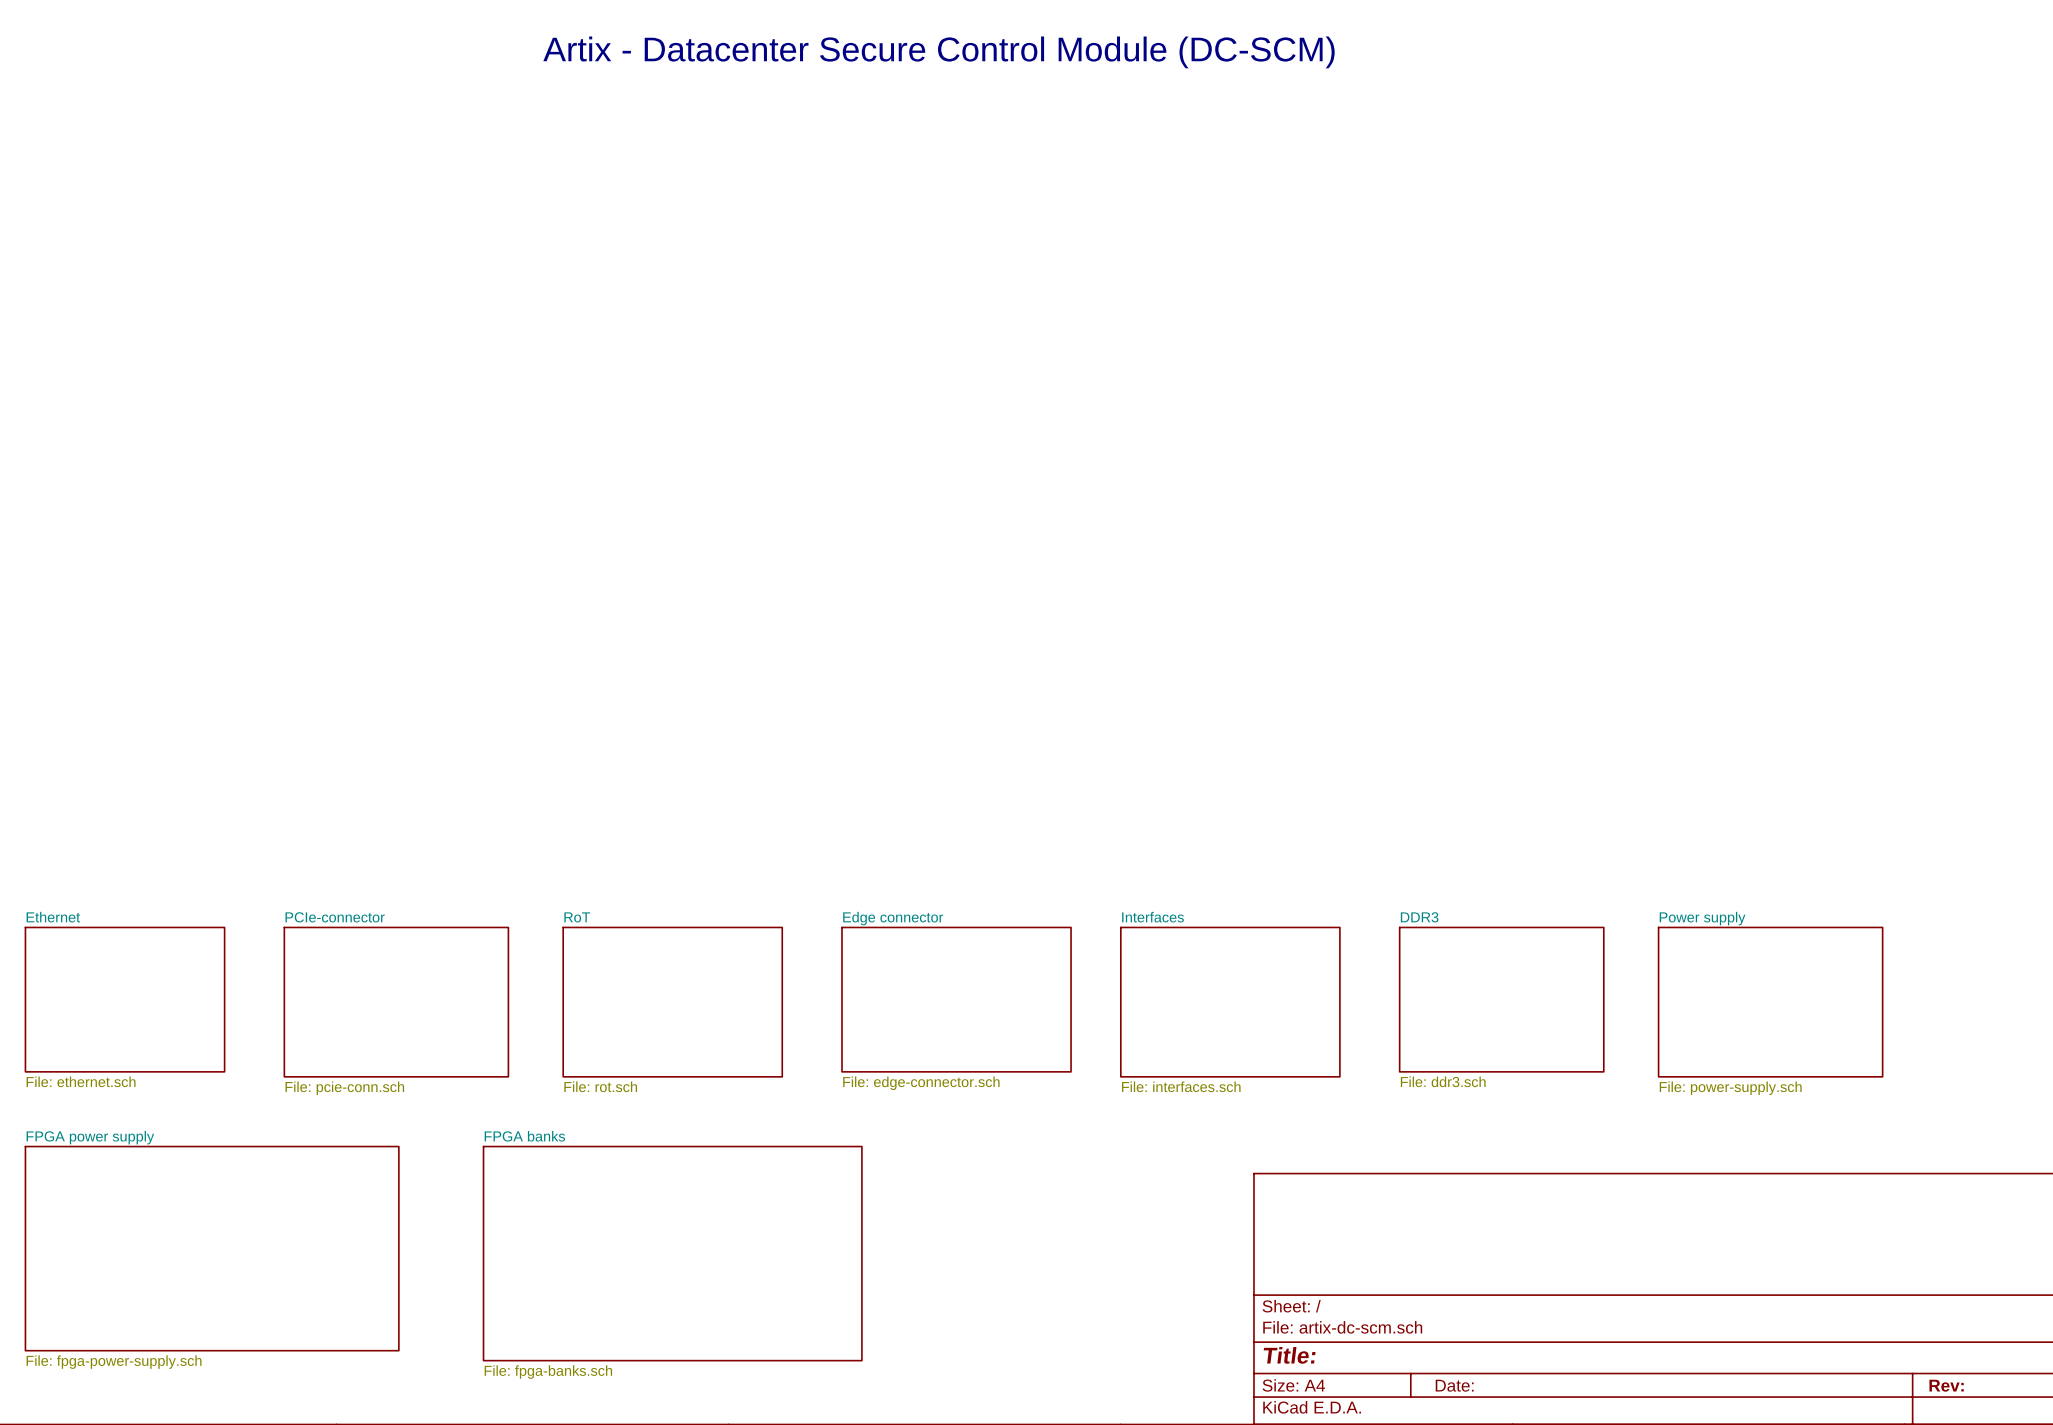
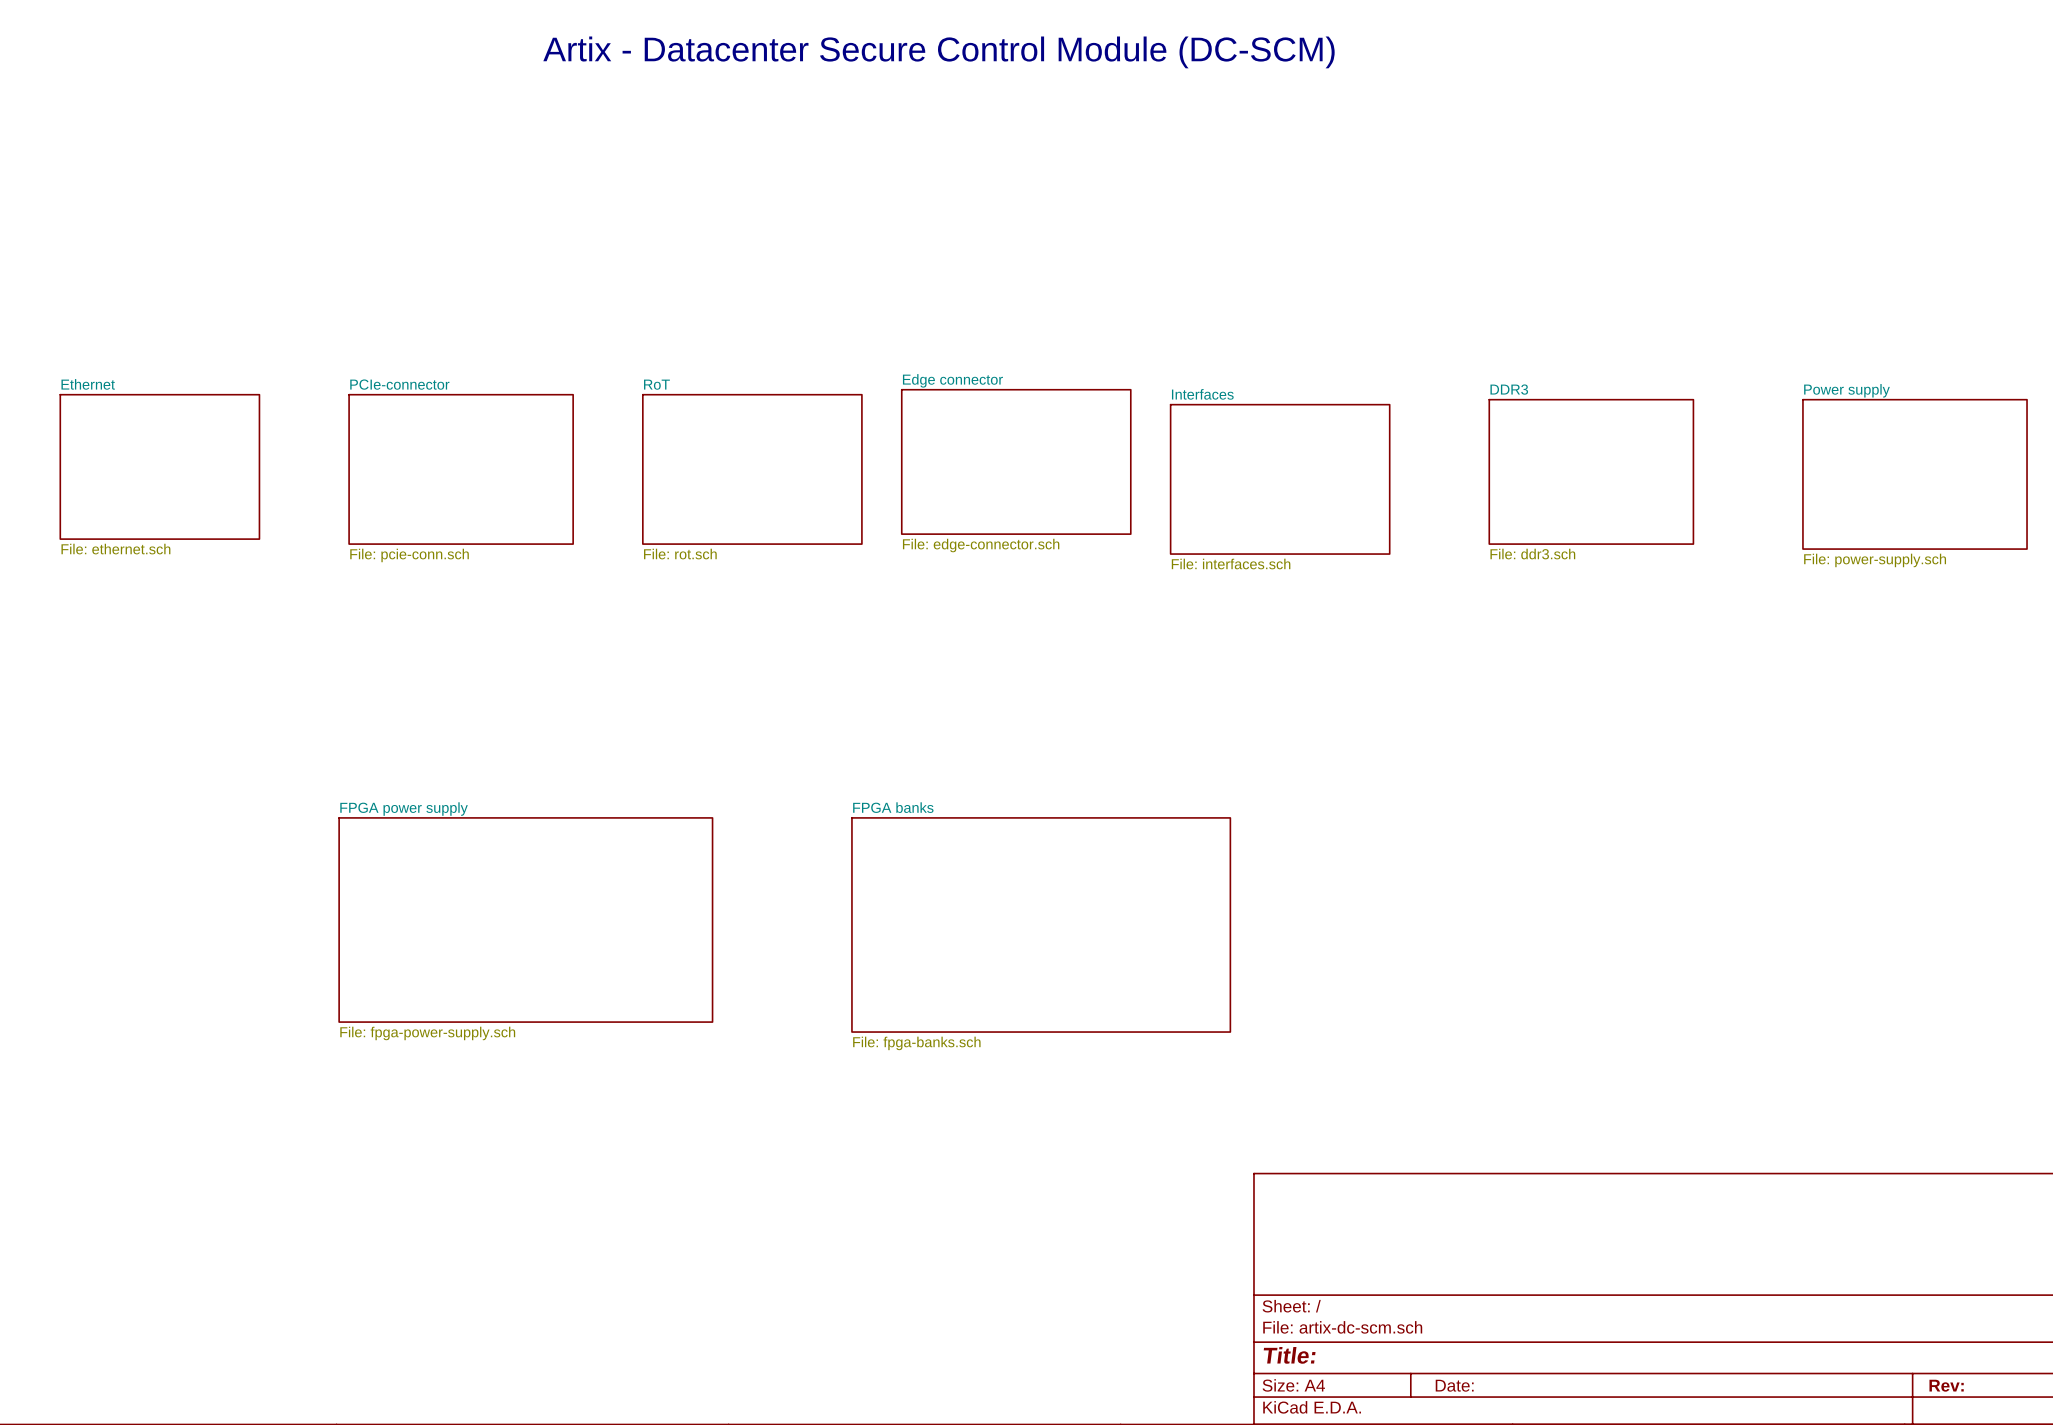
sheet Edge connector: none -> File: edge-connector.sch (1016, 461)
sheet Ethernet: none -> File: ethernet.sch (159, 466)
sheet PCIe-connector: none -> File: pcie-conn.sch (461, 469)
sheet RoT: none -> File: rot.sch (752, 469)
sheet Power supply: none -> File: power-supply.sch (1914, 474)
sheet Interfaces: none -> File: interfaces.sch (1280, 479)
sheet FPGA power supply: none -> File: fpga-power-supply.sch (525, 919)
sheet FPGA banks: none -> File: fpga-banks.sch (1041, 924)
sheet Ethernet: File: ethernet.sch (125, 999) -> none
sheet Edge connector: File: edge-connector.sch (956, 999) -> none
sheet DDR3 position: (1501, 999) -> (1591, 471)
sheet PCIe-connector: File: pcie-conn.sch (396, 1002) -> none
sheet RoT: File: rot.sch (672, 1002) -> none
sheet Interfaces: File: interfaces.sch (1230, 1002) -> none
sheet Power supply: File: power-supply.sch (1770, 1002) -> none
sheet FPGA power supply: File: fpga-power-supply.sch (212, 1248) -> none
sheet FPGA banks: File: fpga-banks.sch (672, 1253) -> none

